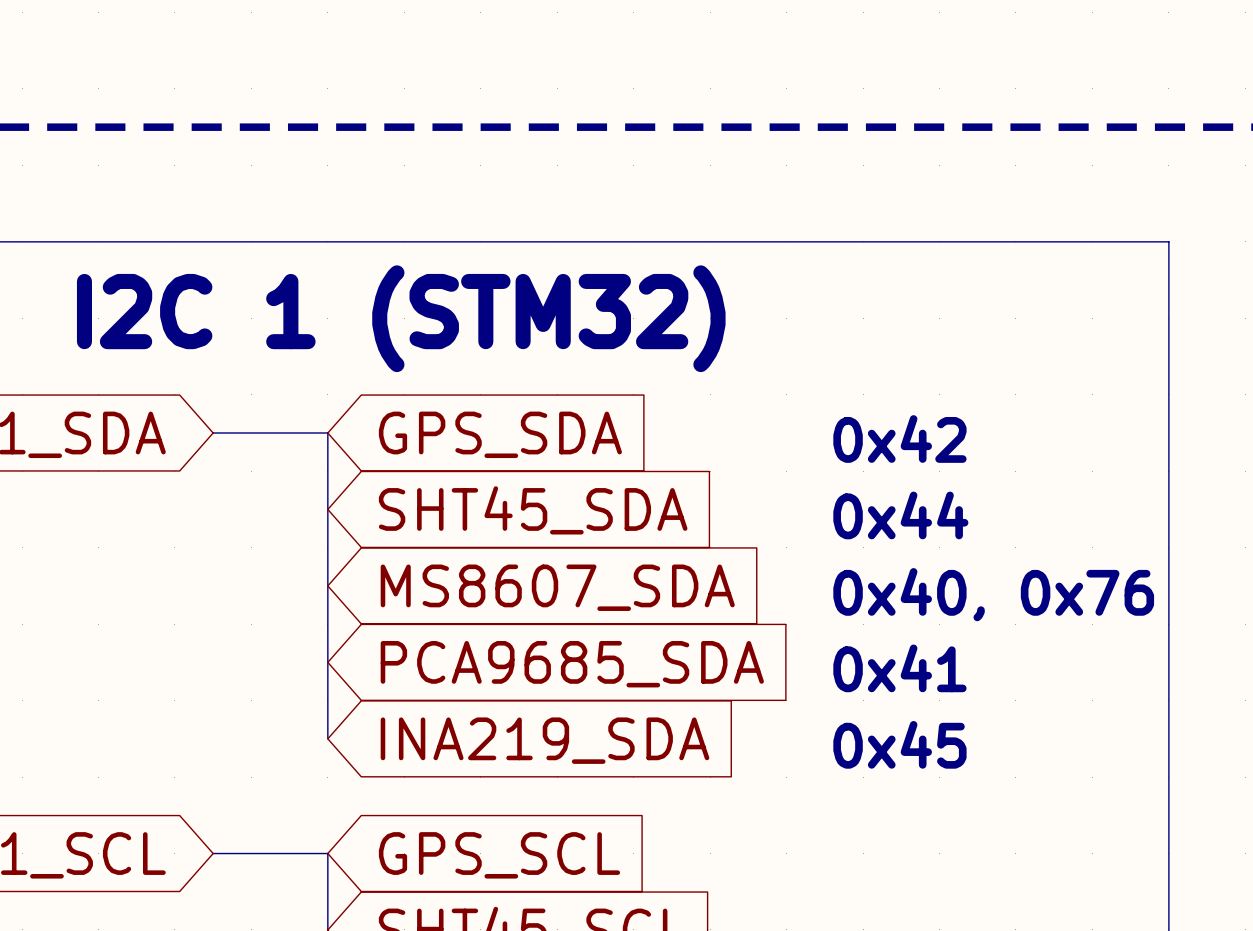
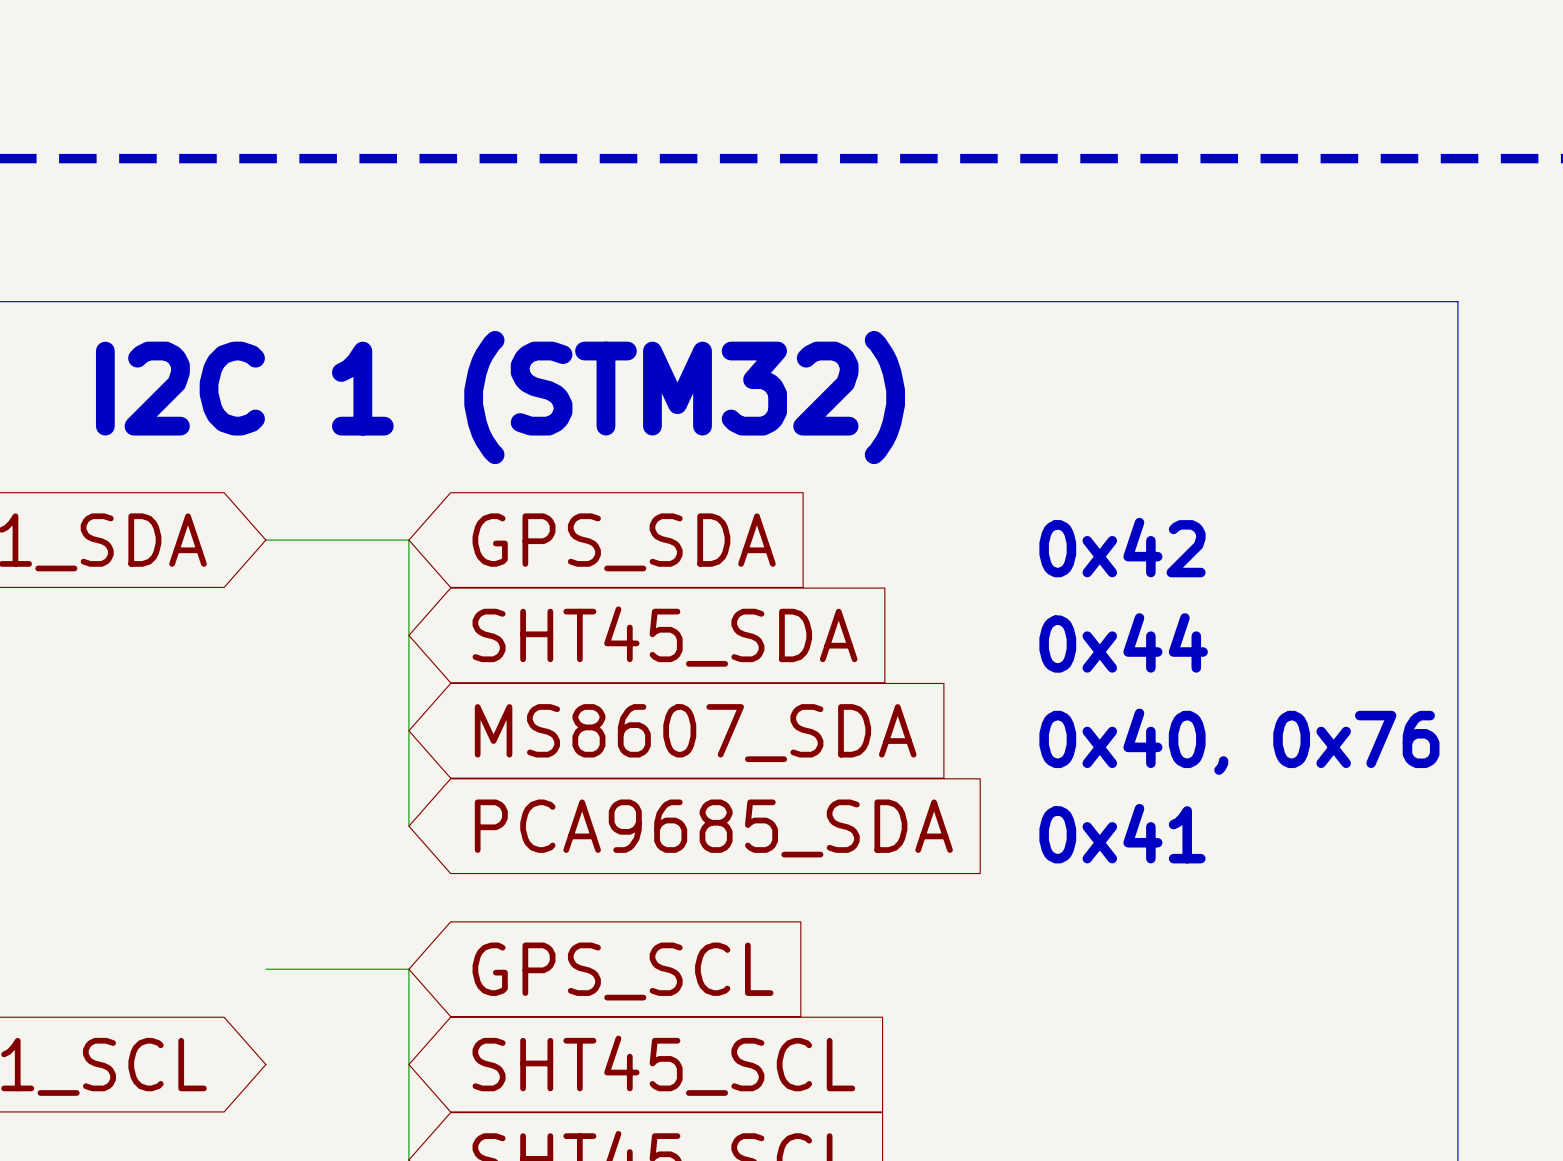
wire: (327, 662) (327, 738) -> none
global label: INA219_SDA (544, 740) -> none
text: 0x45 (899, 744) -> none
global label: none -> GPS_SCL (622, 971)
wire: (213, 853) (327, 853) -> (265, 969) (408, 969) (408, 1064)
global label: GPS_SCL (499, 855) -> SHT45_SCL (663, 1065)

